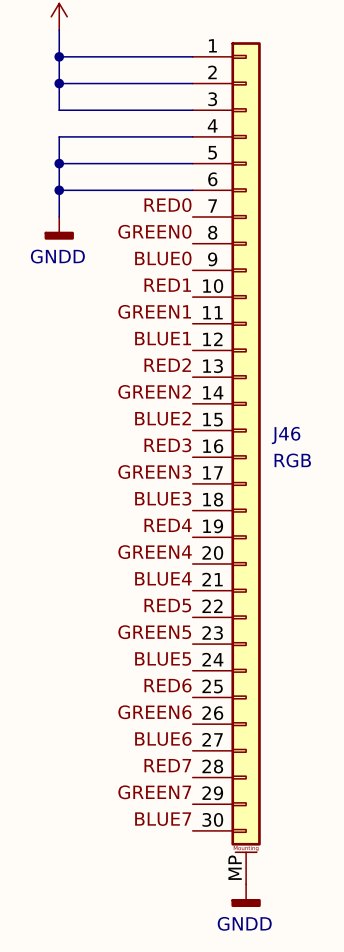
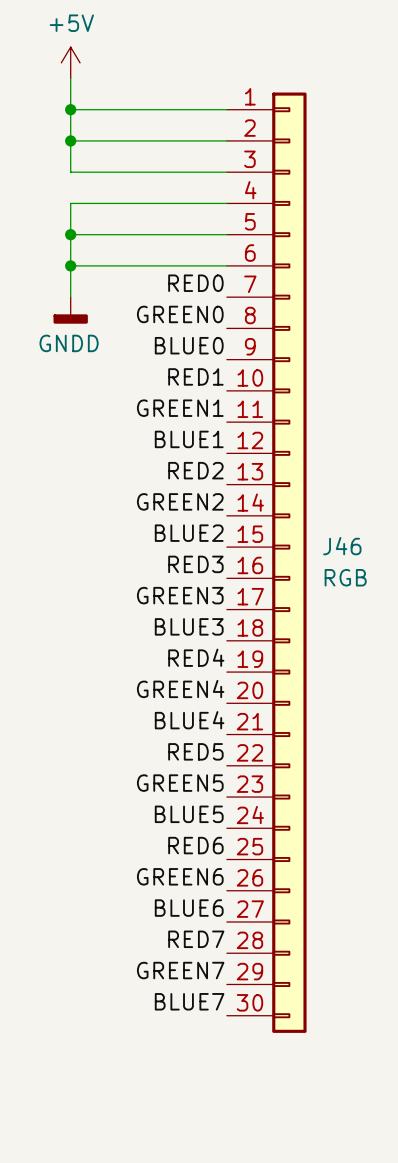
J46 symbol: [192, 42, 261, 885] -> [226, 92, 307, 1033]
power symbol: GNDD (246, 895) -> none

